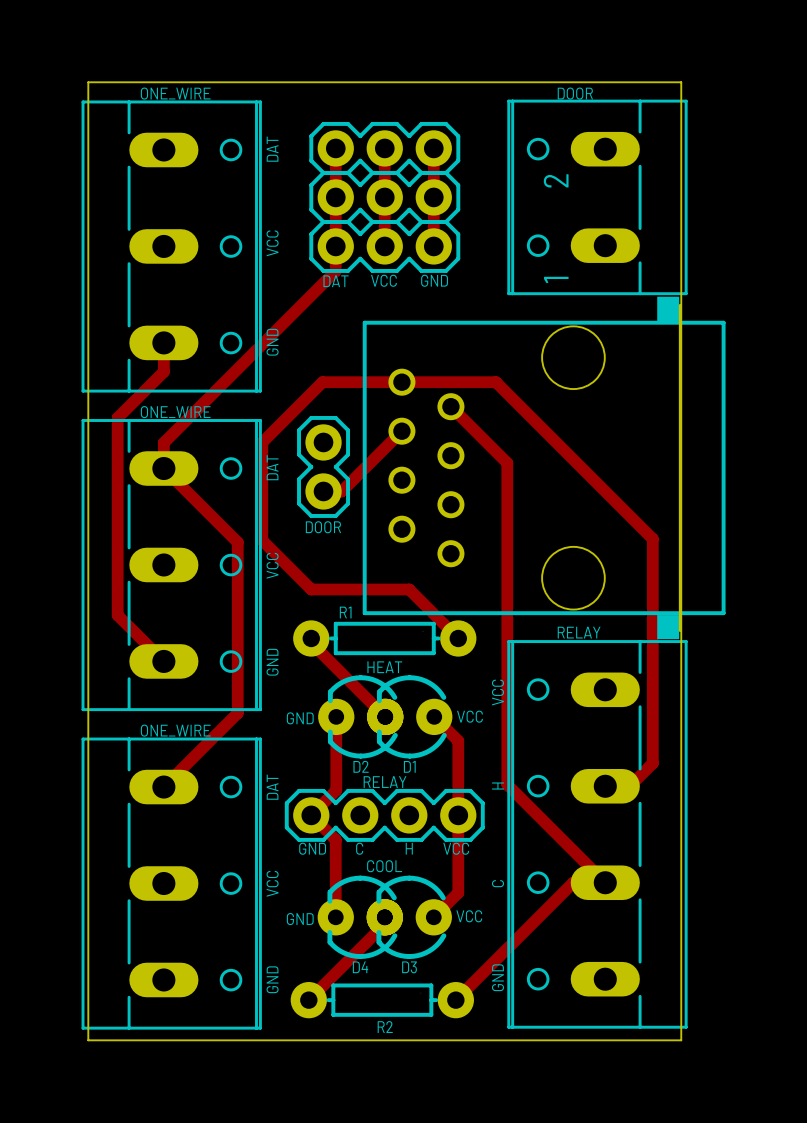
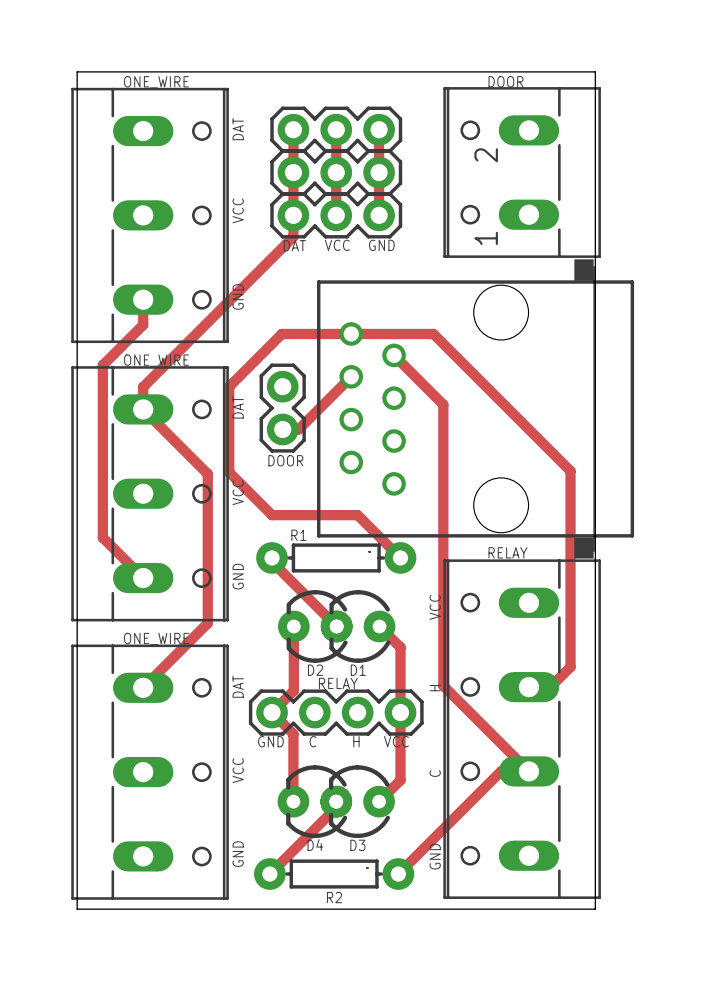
text: HEAT (384, 667) -> none
text: VCC (469, 716) -> none
text: GND (300, 718) -> none
text: COOL (384, 866) -> none
text: VCC (469, 916) -> none
text: GND (300, 919) -> none

